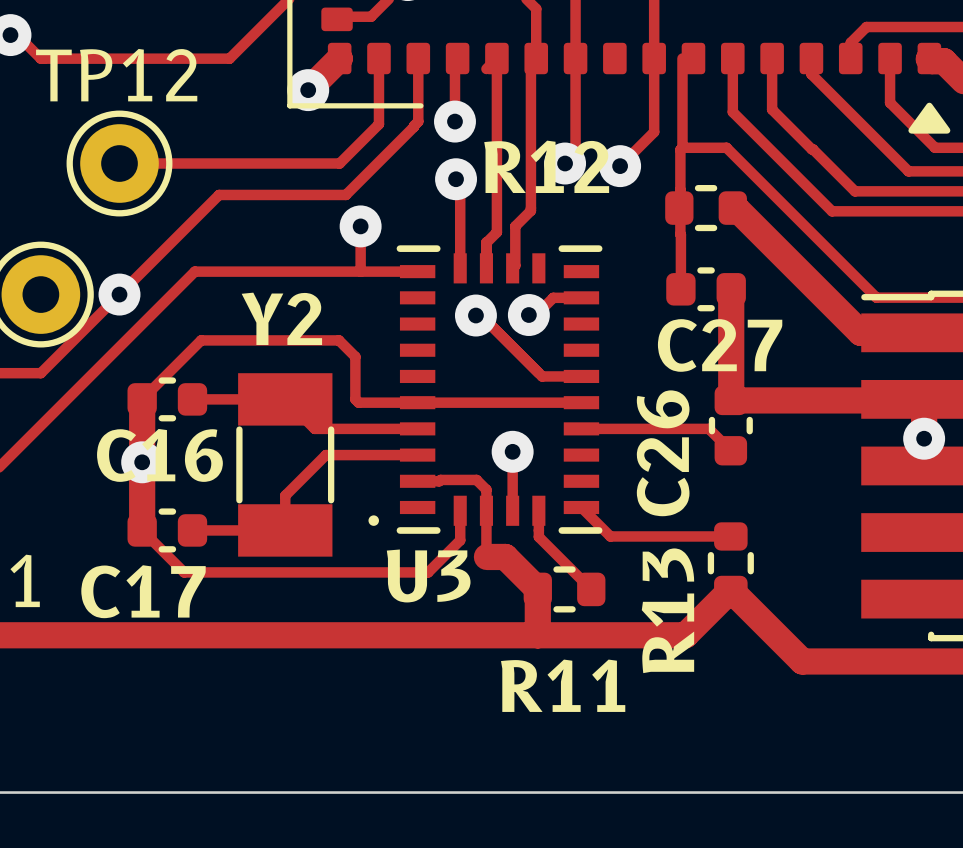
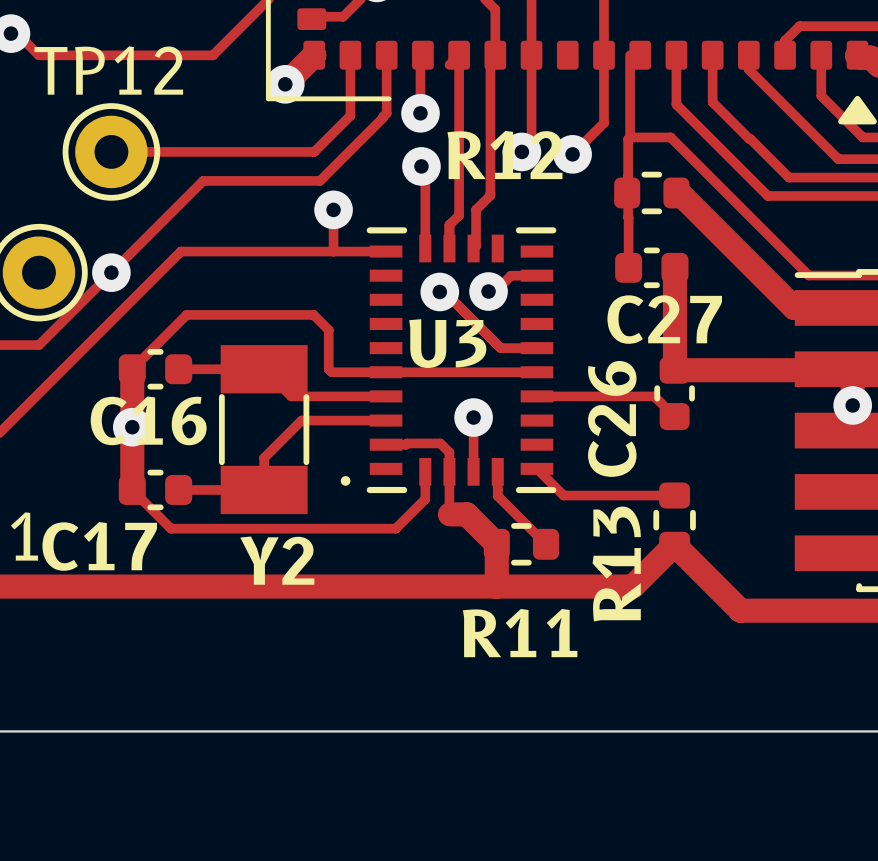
Y2 name position: Y2 (281, 318) -> Y2 (277, 560)
U3 name position: U3 (428, 575) -> U3 (447, 343)
C17 name position: C17 (143, 591) -> C17 (99, 546)

